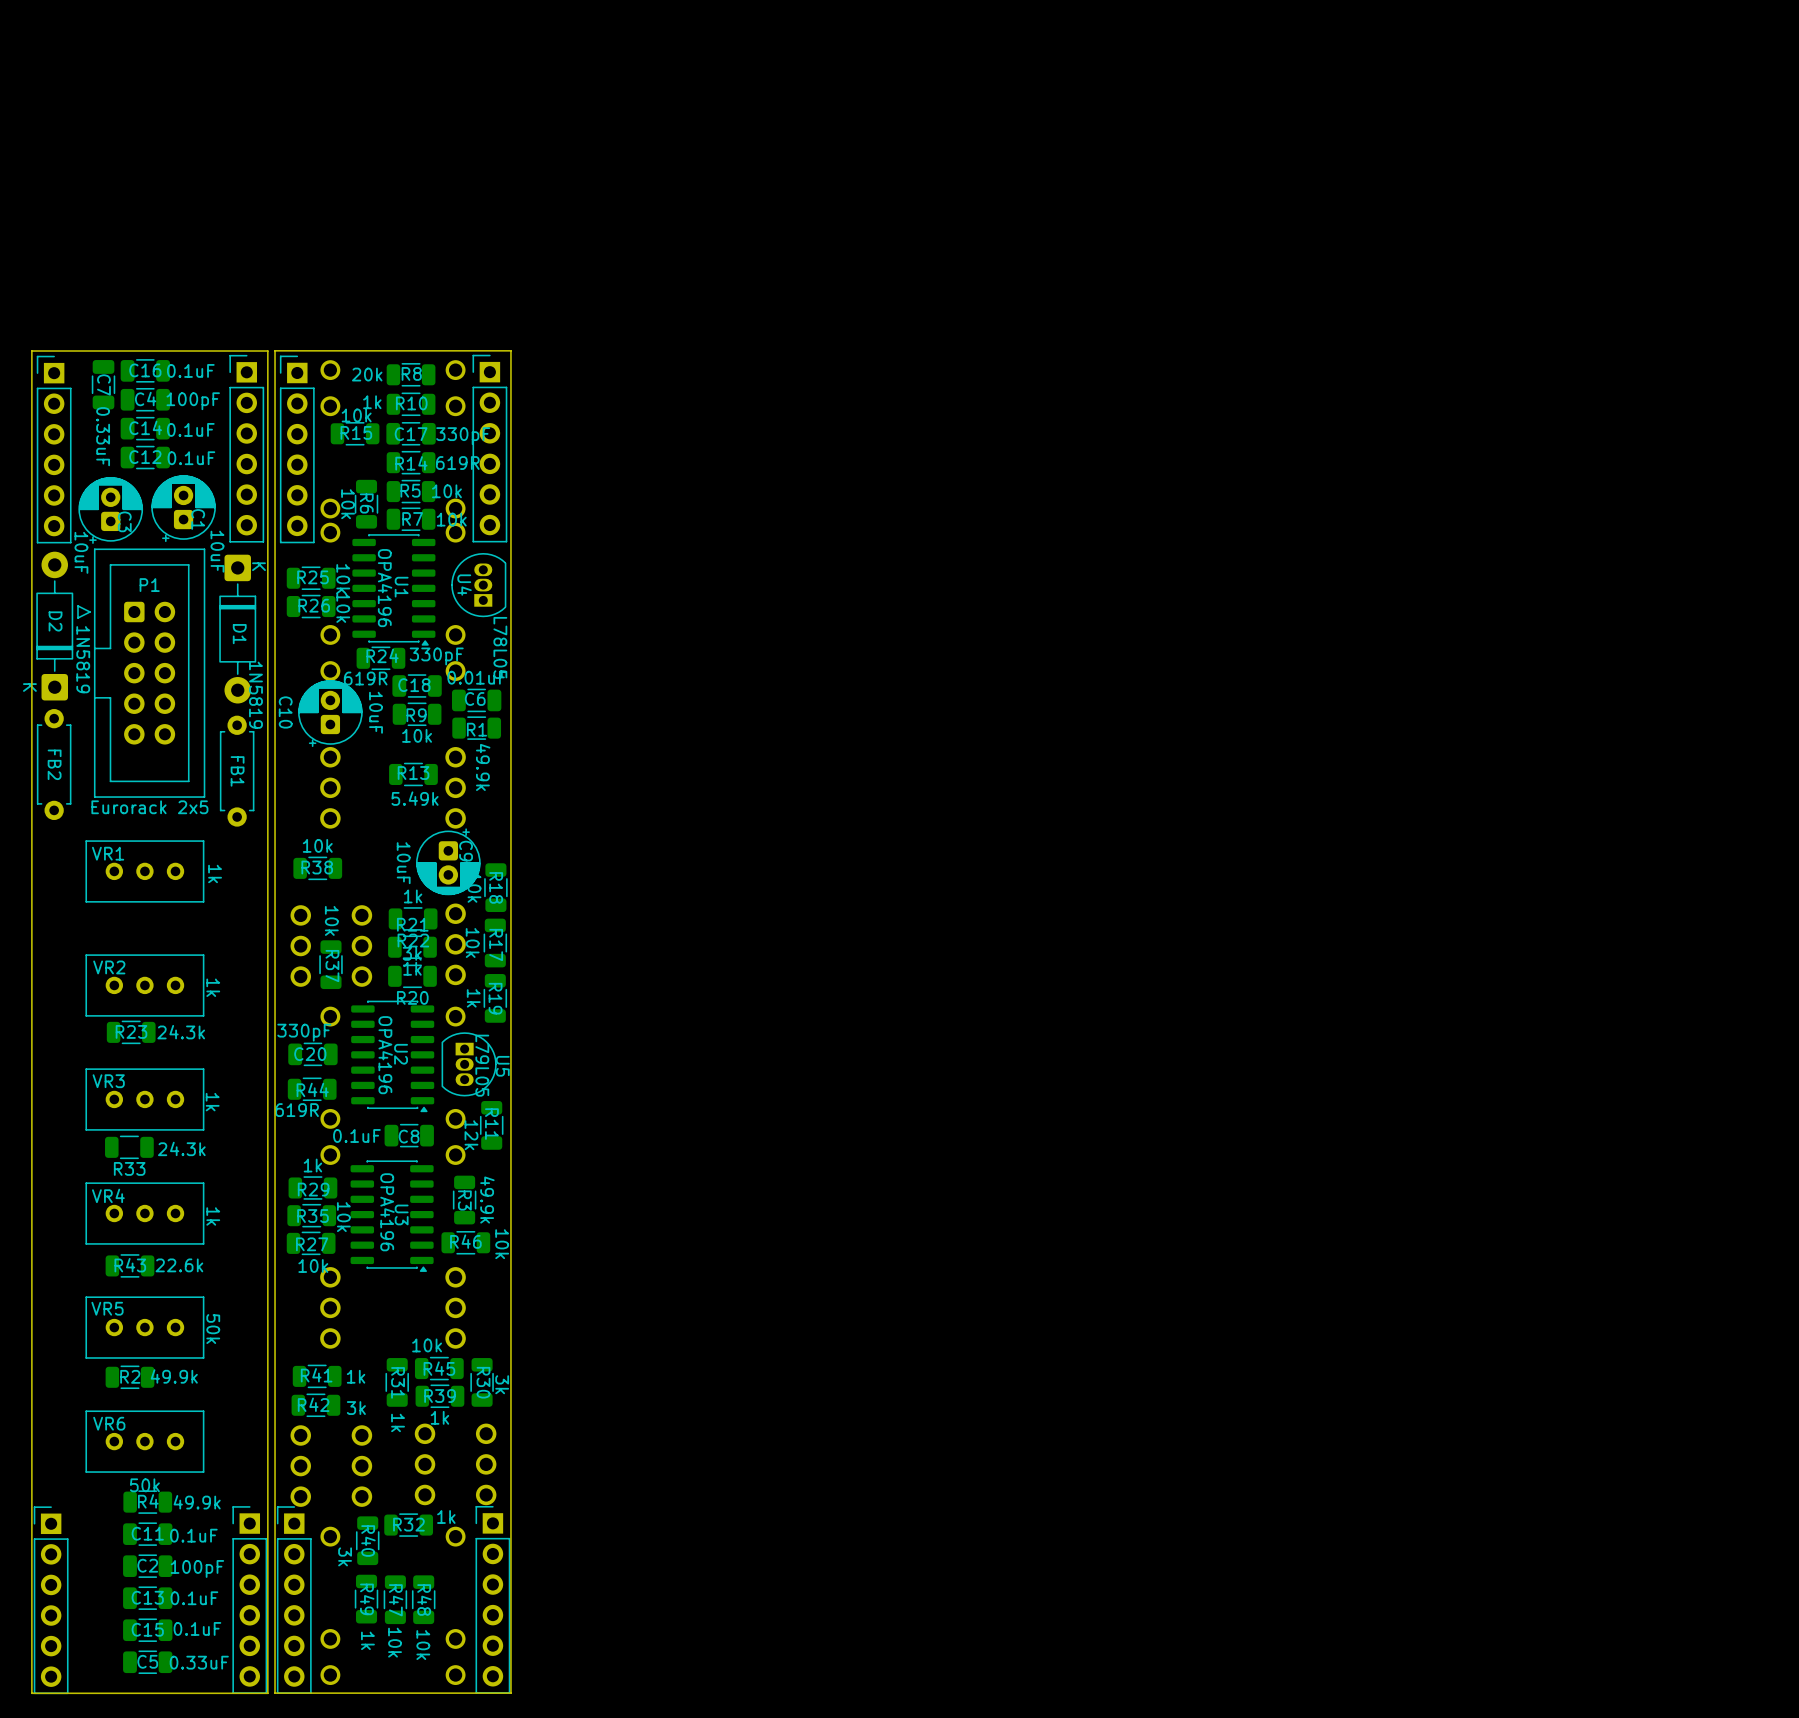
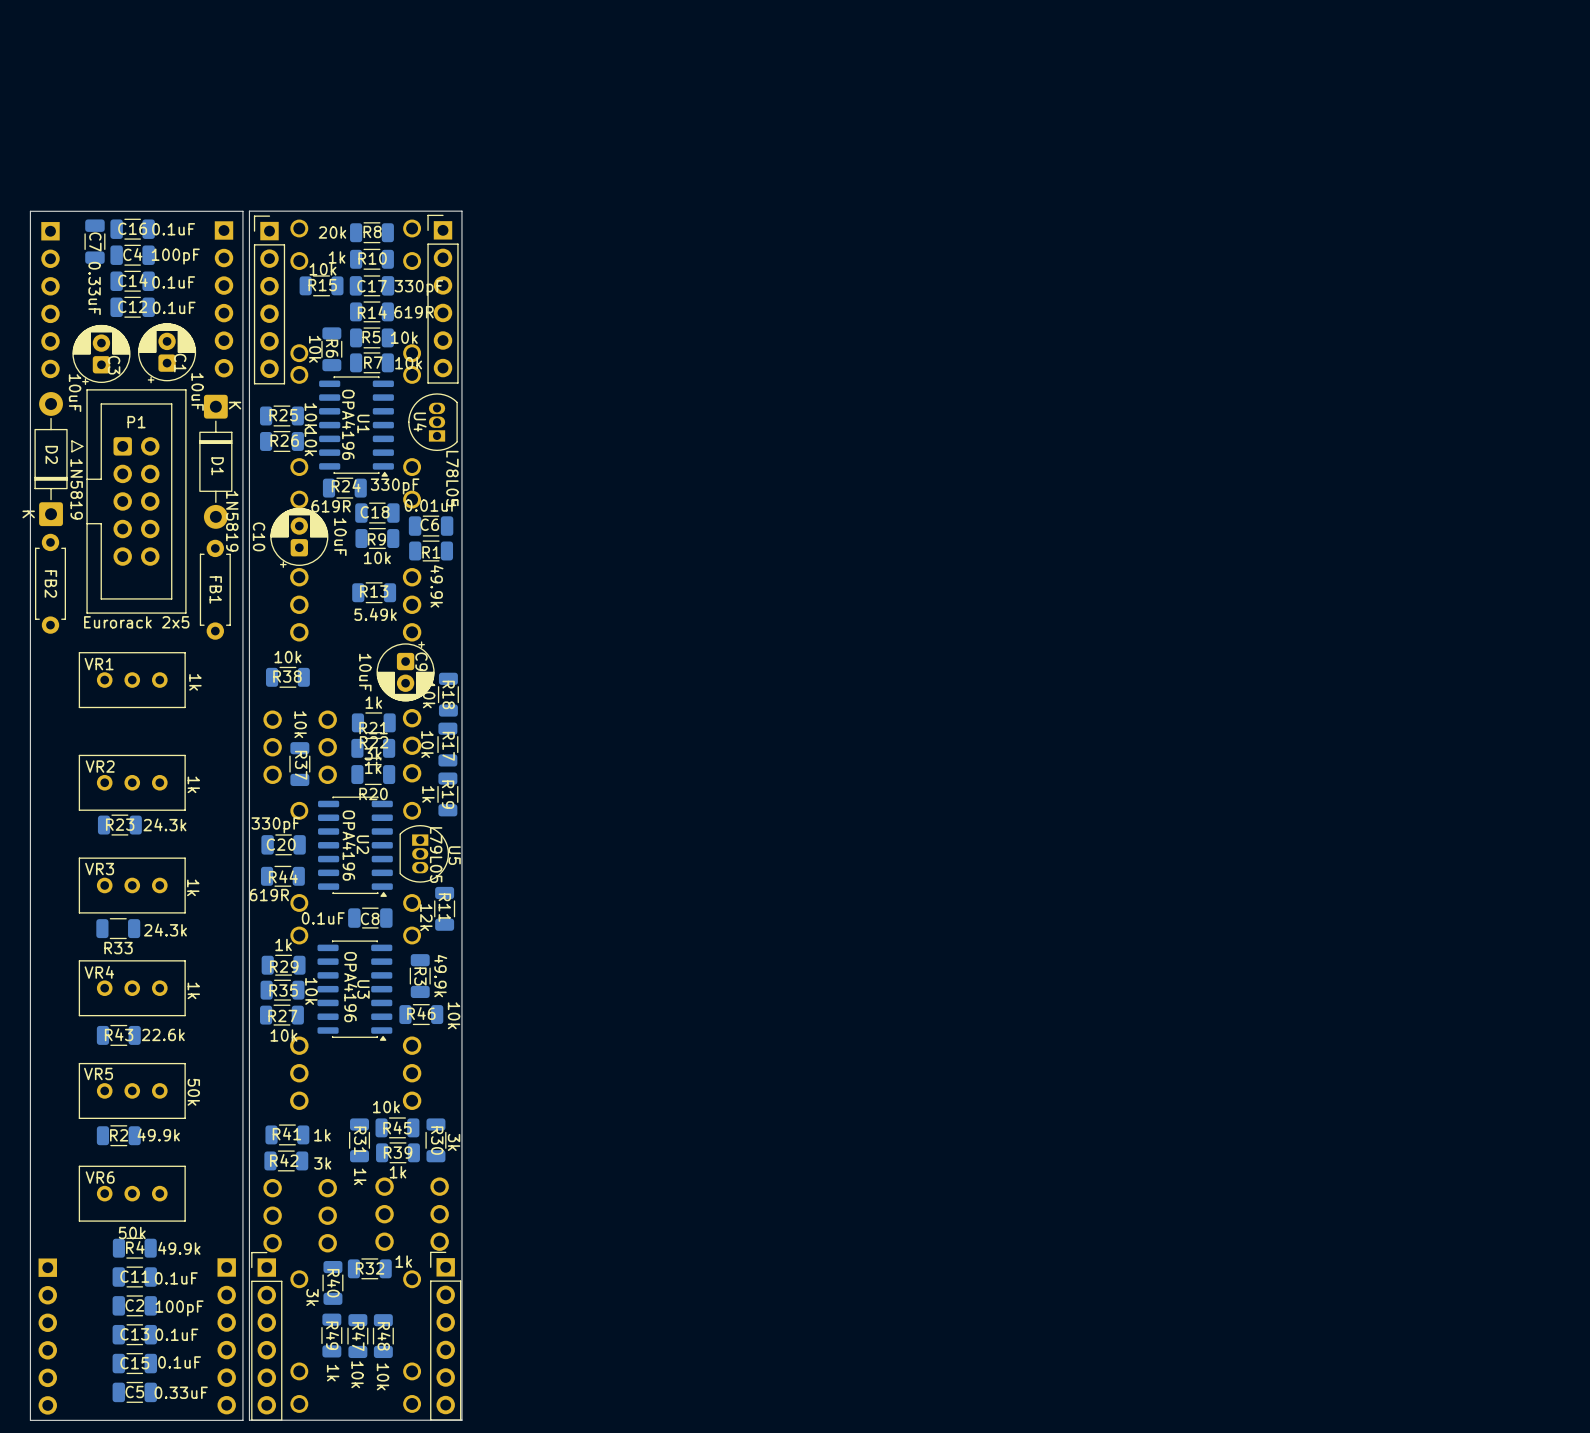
part side: bottom (246, 448) -> top (223, 299)
part side: bottom (54, 449) -> top (50, 300)
part side: bottom (249, 1599) -> top (226, 1336)
part side: bottom (51, 1600) -> top (47, 1336)

